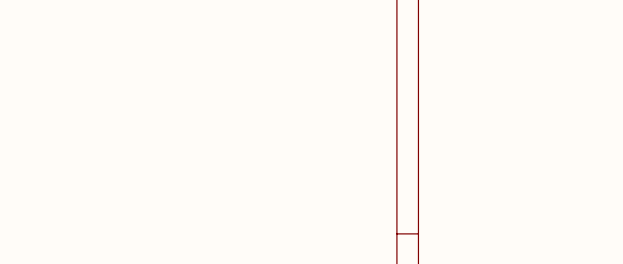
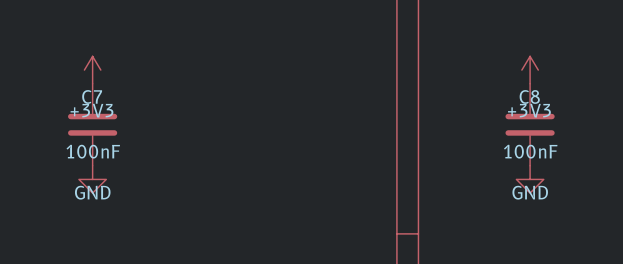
power symbol: none -> +3V3 (92, 70)
power symbol: none -> +3V3 (530, 70)
C7: none -> 100nF (92, 124)
C8: none -> 100nF (530, 124)
power symbol: none -> GND (92, 179)
power symbol: none -> GND (530, 179)

